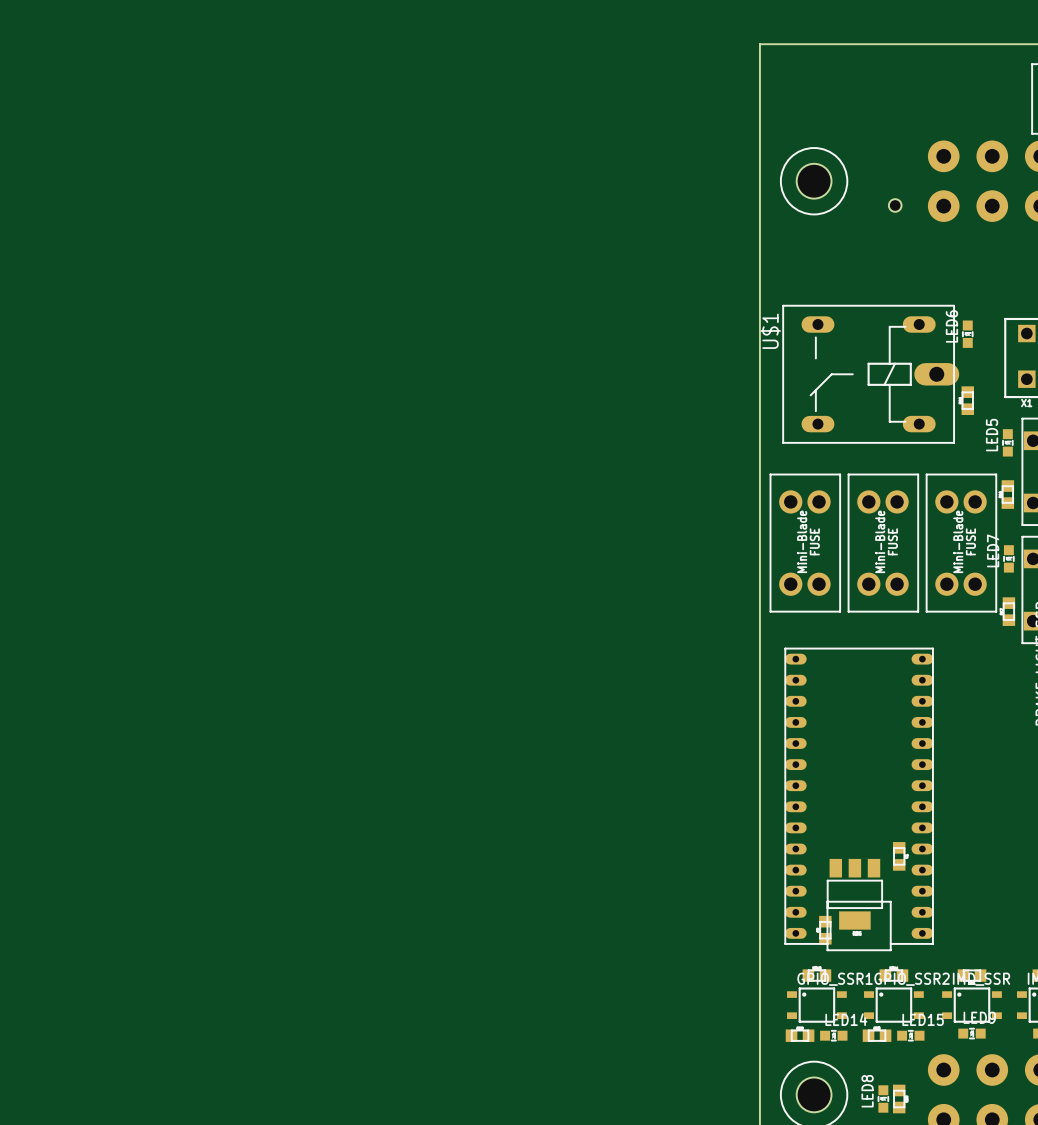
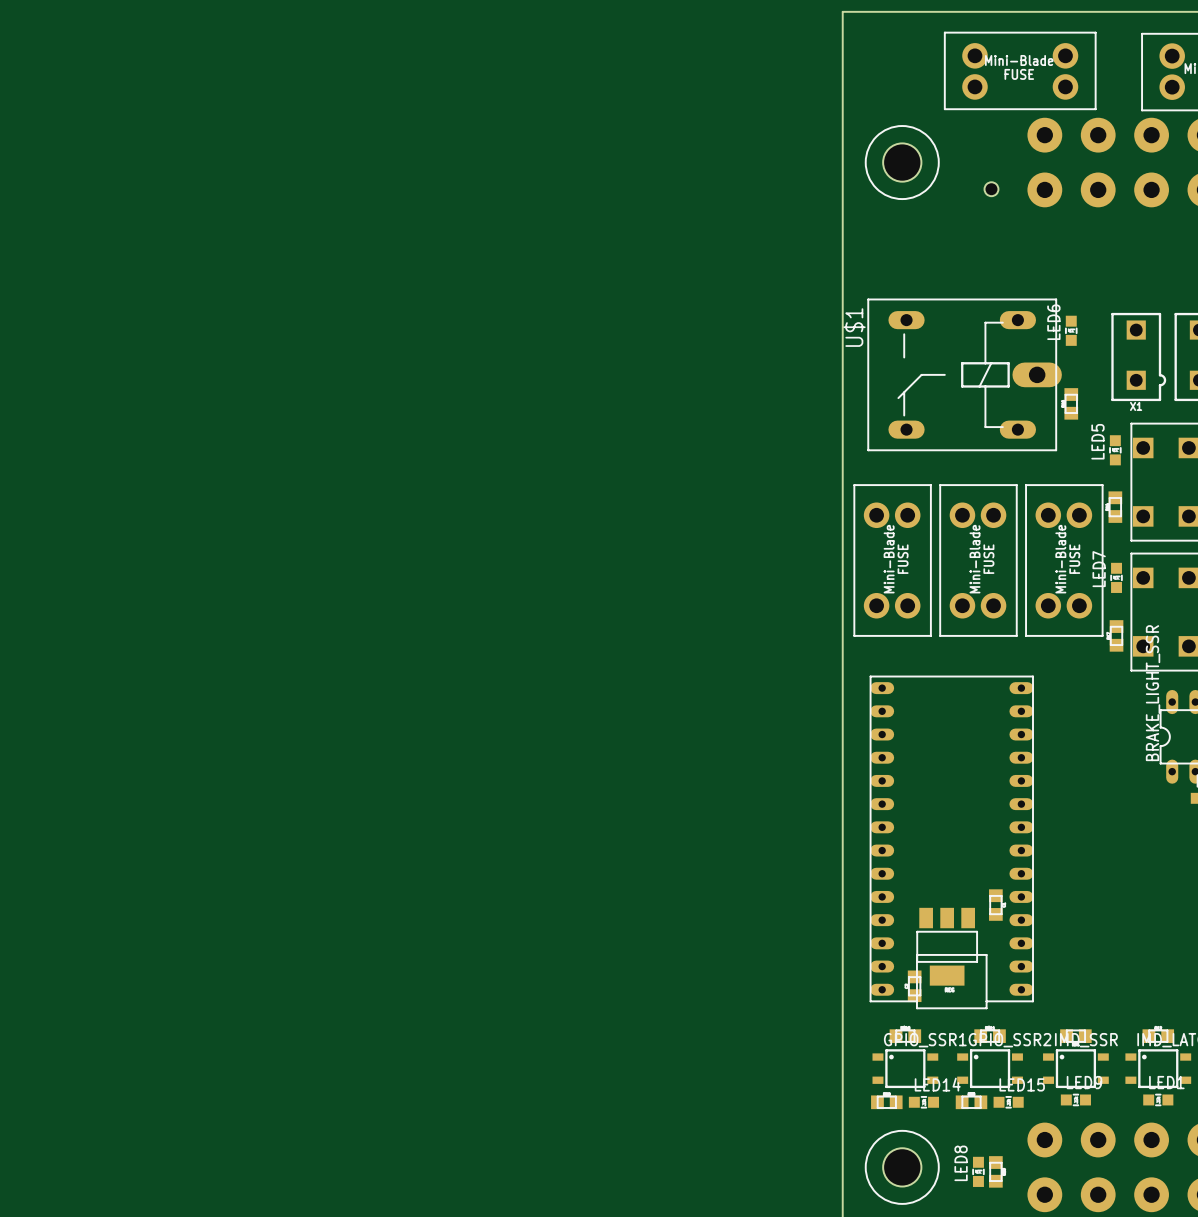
part: none -> (1020, 70)

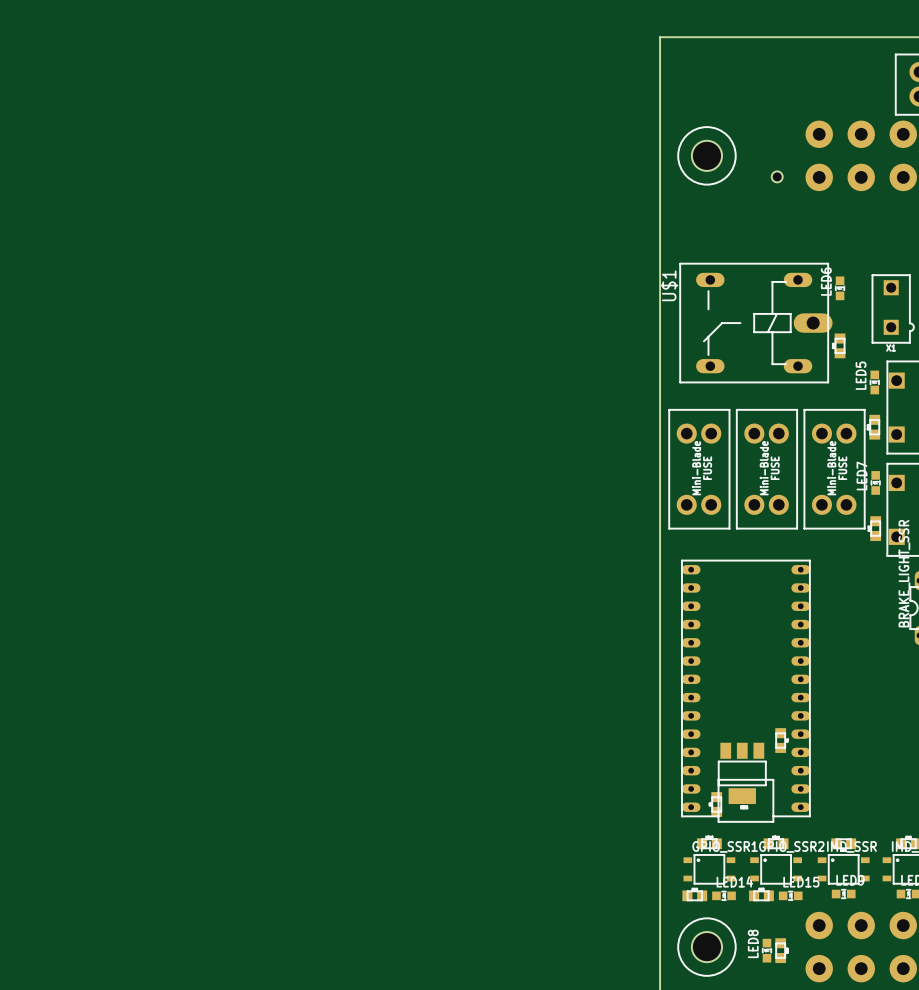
part: (1020, 70) -> none

